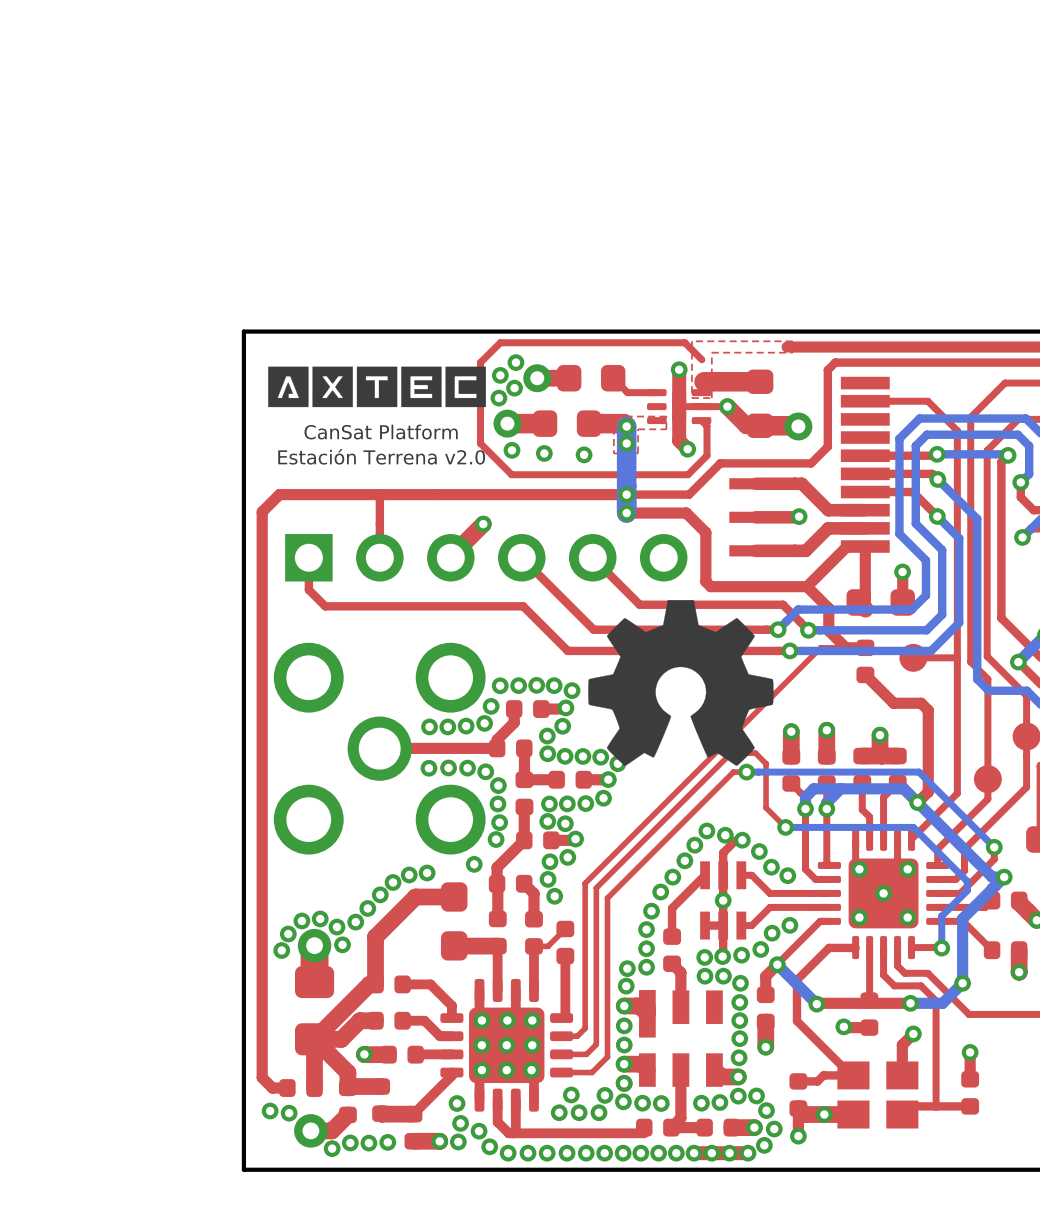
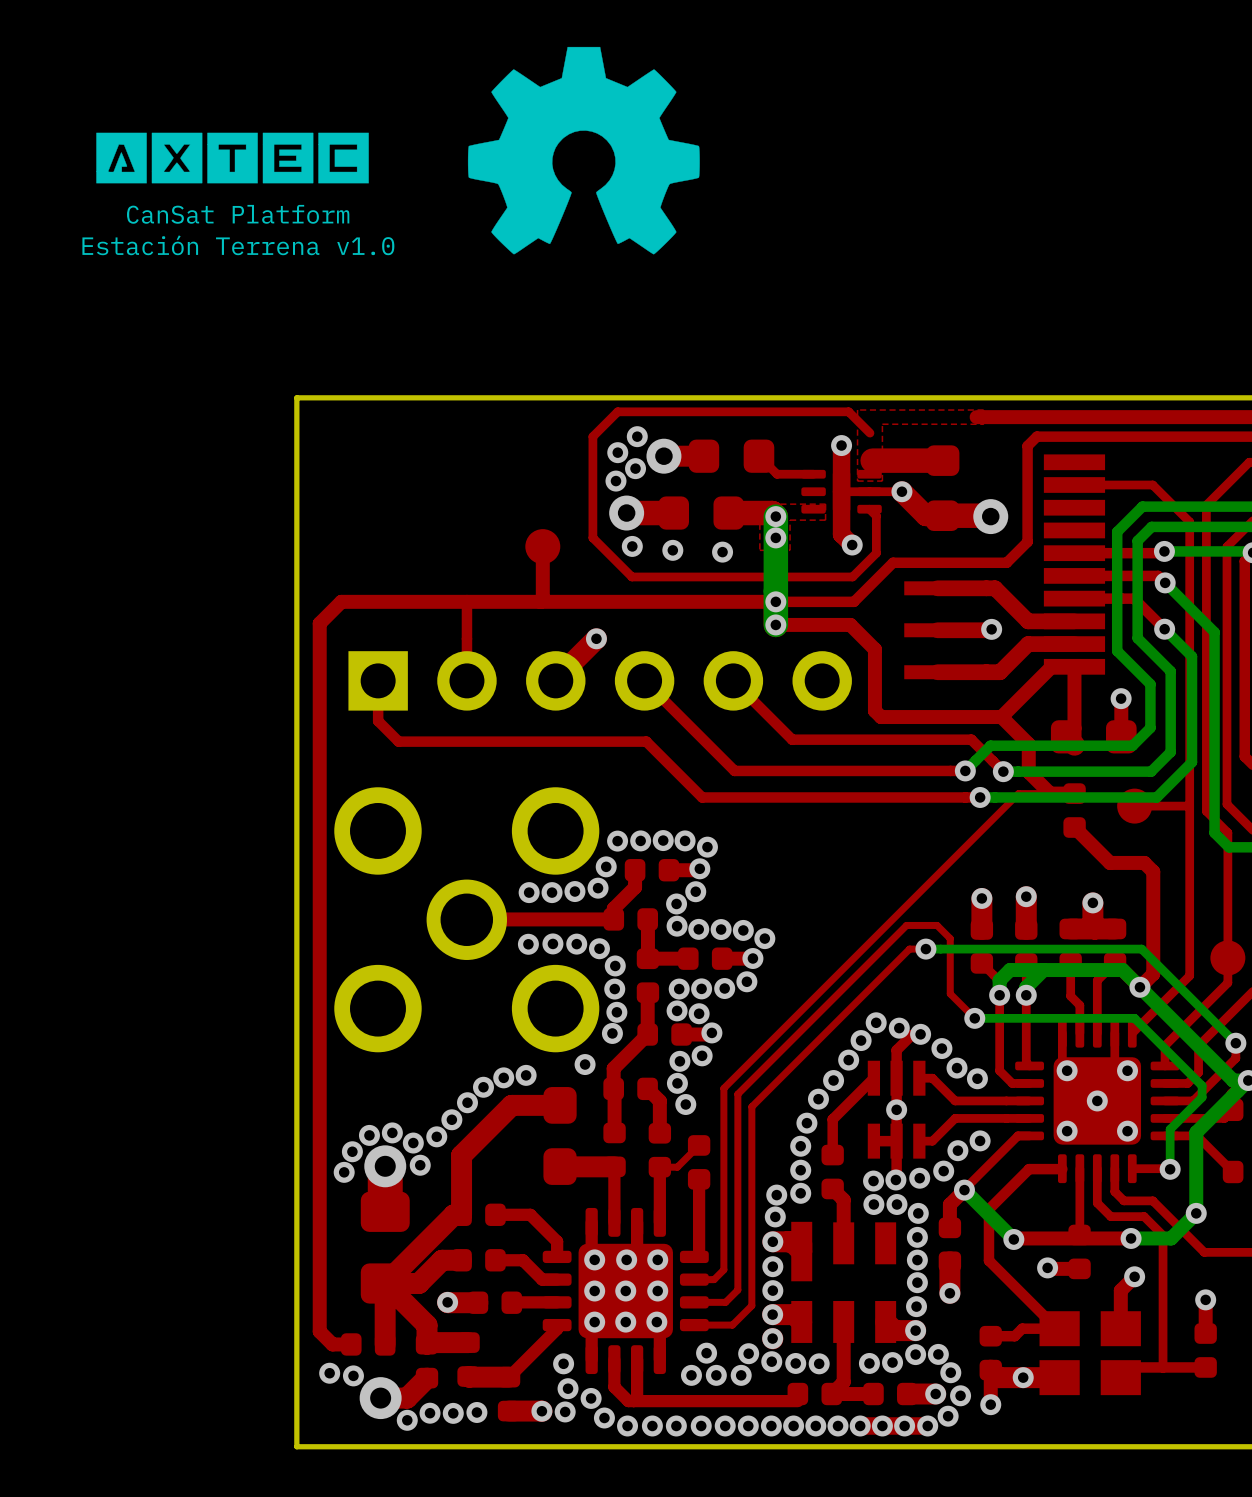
text: none -> Estación Terrena v1.0 (238, 245)
drawing position: (377, 386) -> (232, 158)
text position: CanSat Platform (381, 432) -> CanSat Platform (238, 214)
top track: none -> (542, 546) (542, 599) (540, 601)
part: none -> (542, 546)
text: Estación Terrena v2.0 (381, 456) -> none
drawing position: (680, 682) -> (583, 150)

